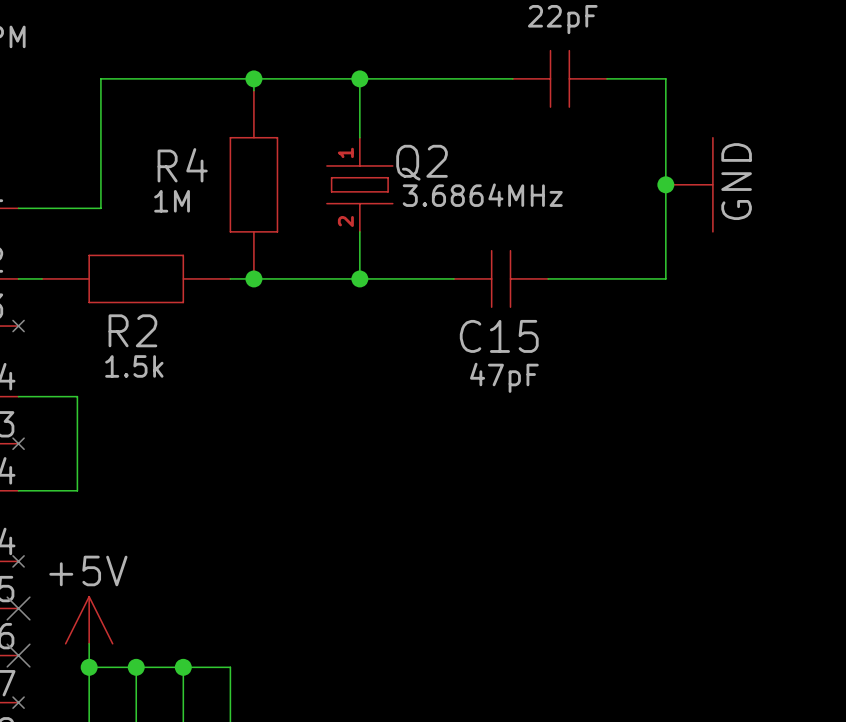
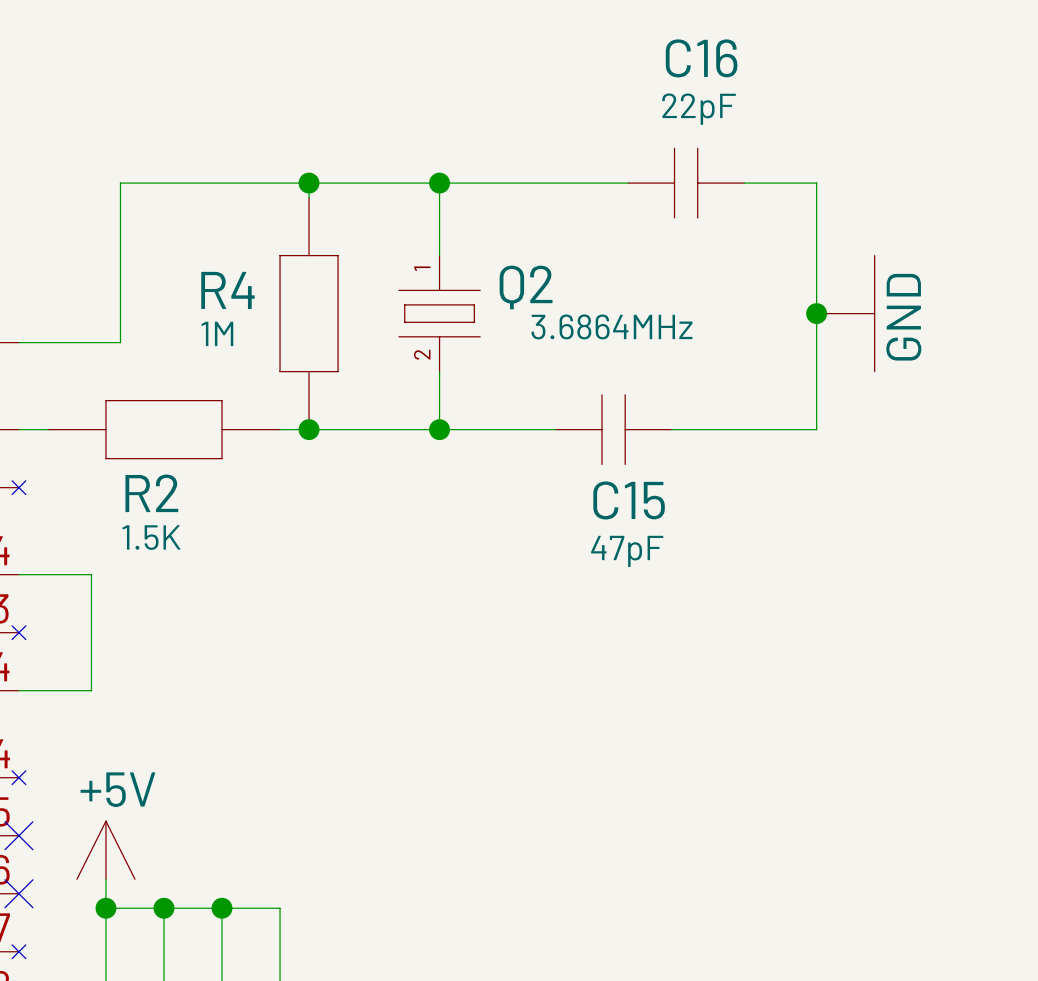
R2 value: 1.5k (134, 366) -> 1.5K (151, 537)

